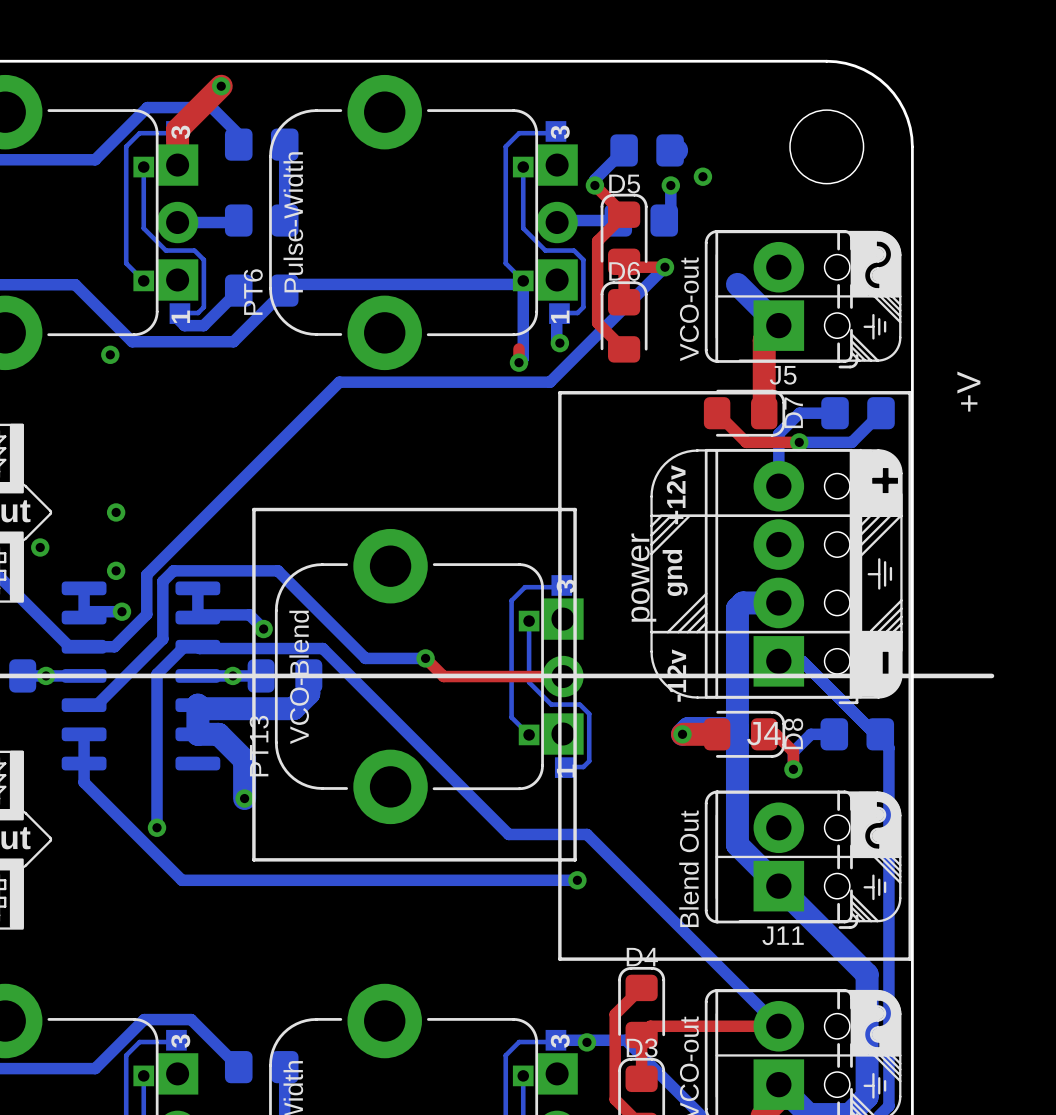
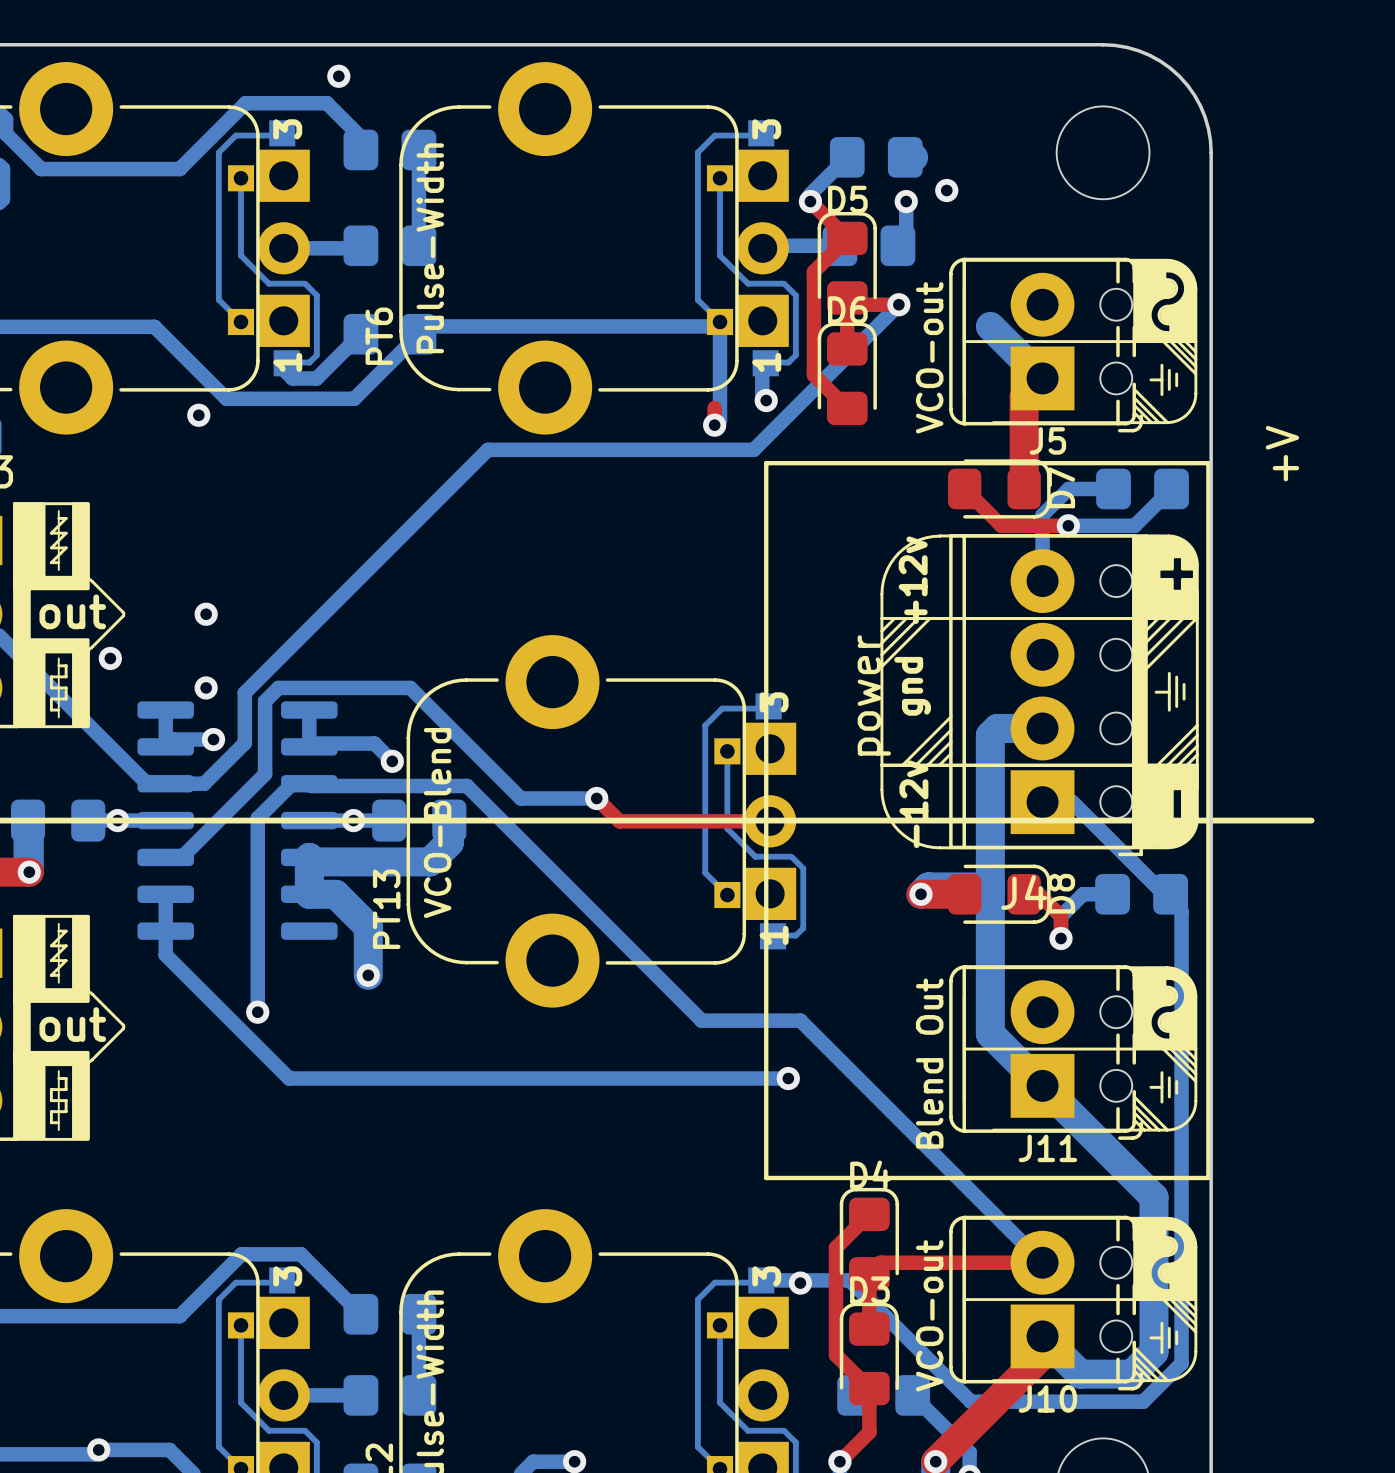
top track: (221, 86) (177, 129) (177, 165) -> none
line: (253, 509) (575, 509) (575, 859) (253, 859) (253, 509) -> none

